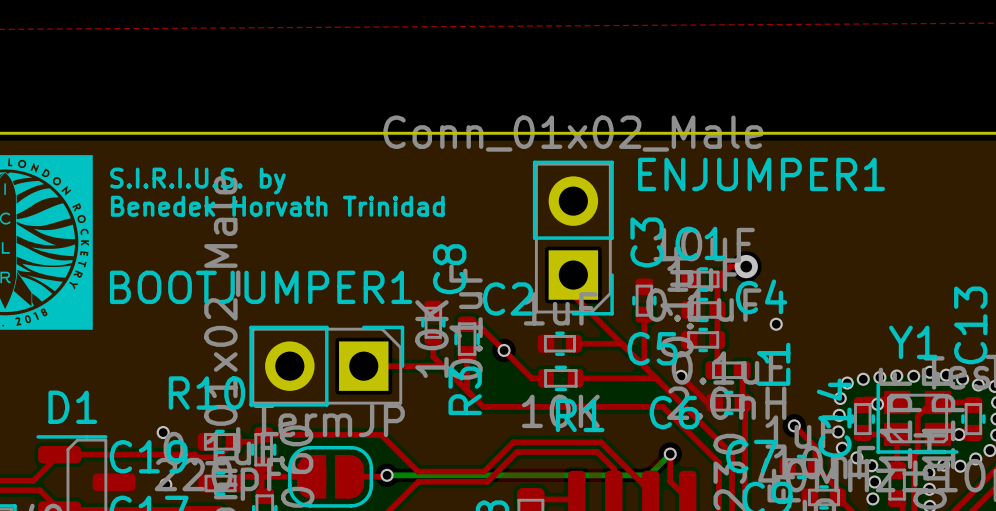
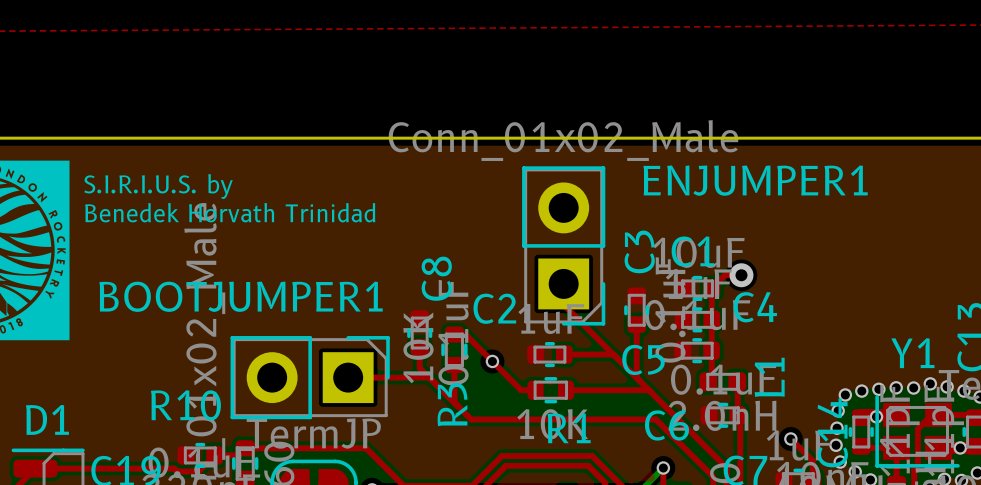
via: (776, 324) -> none
top track: (681, 376) (707, 402) (714, 402) -> none
via: (681, 376) -> none
via: (163, 432) -> none

